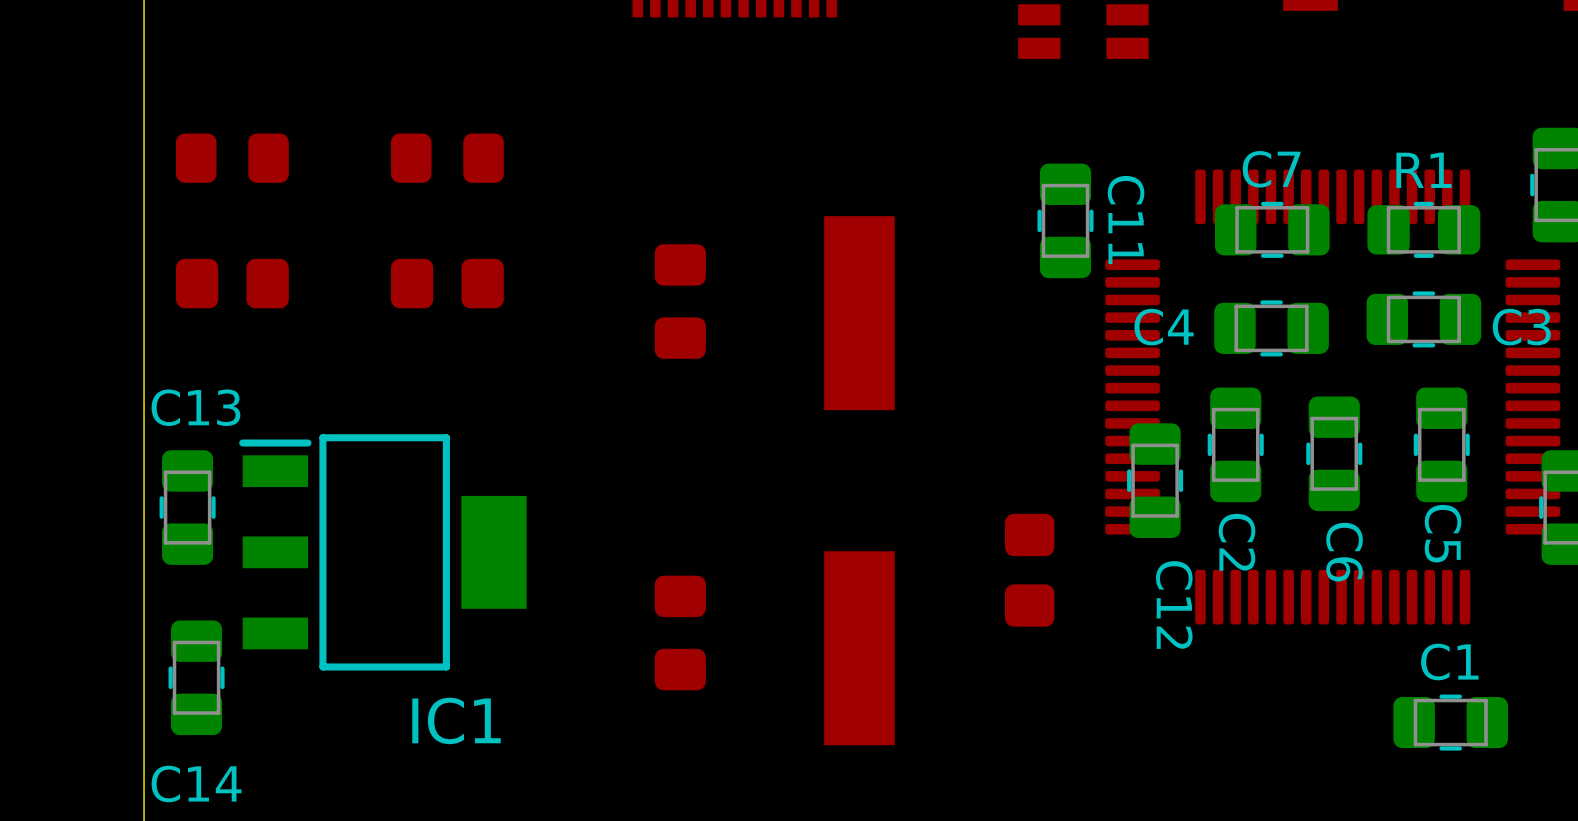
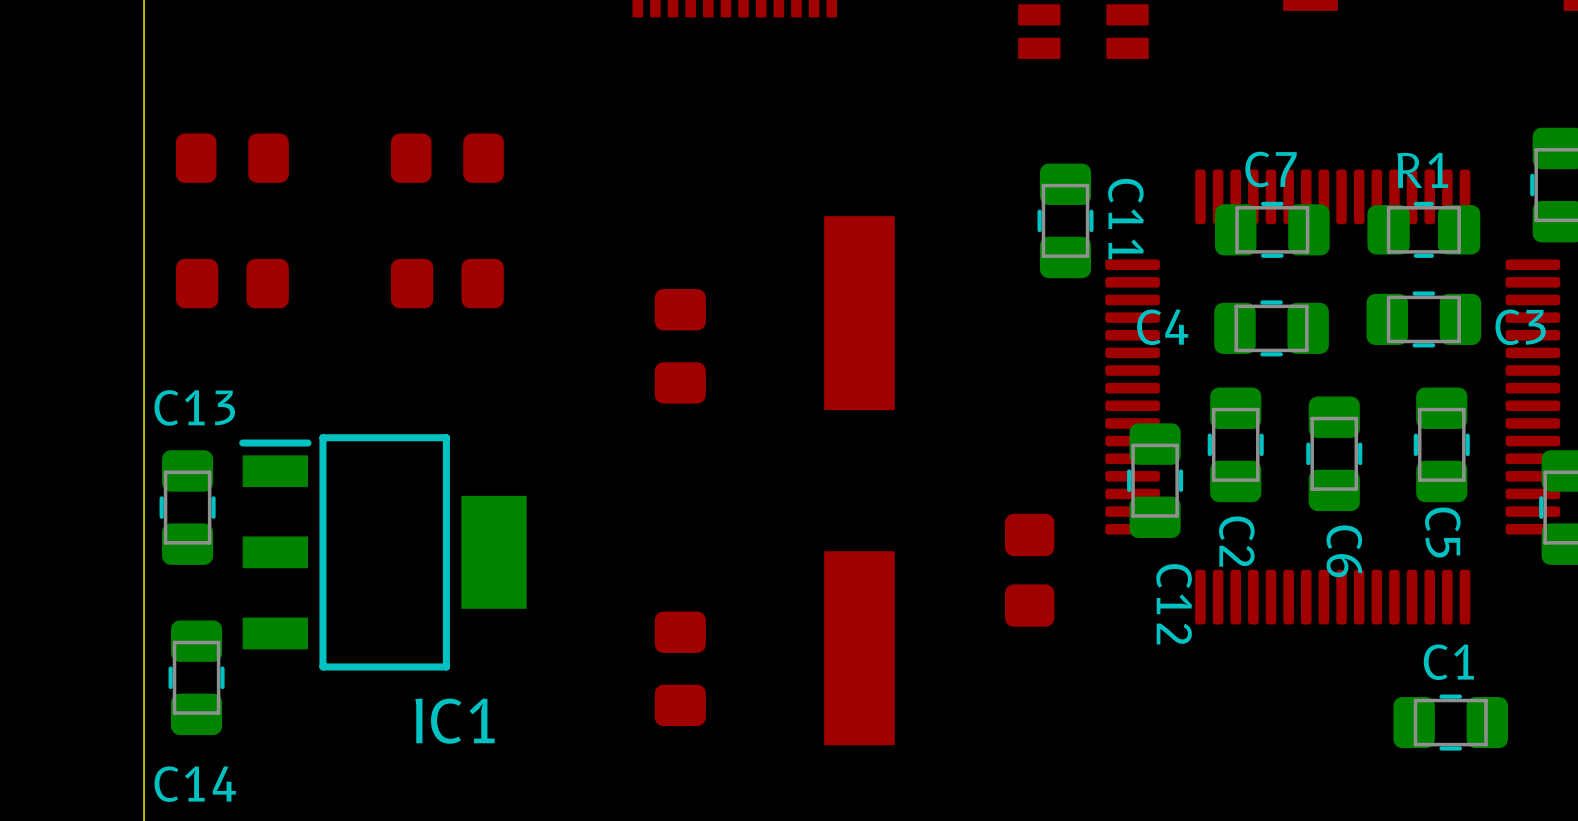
part position: (680, 301) -> (680, 346)
part position: (680, 632) -> (680, 668)

